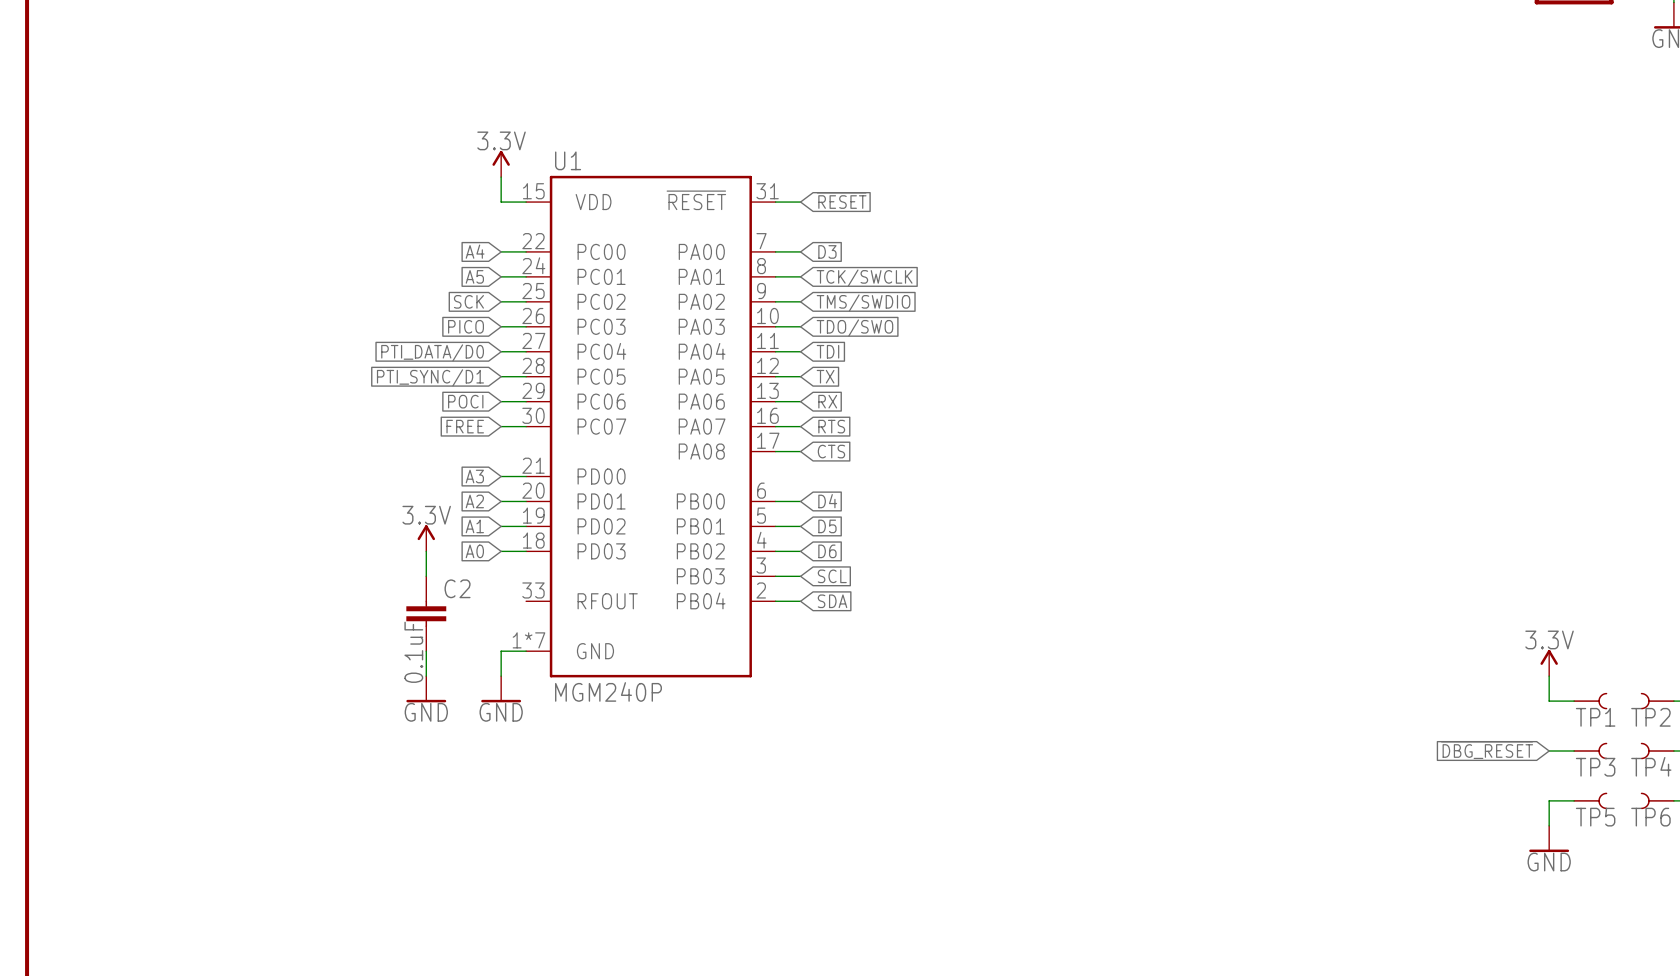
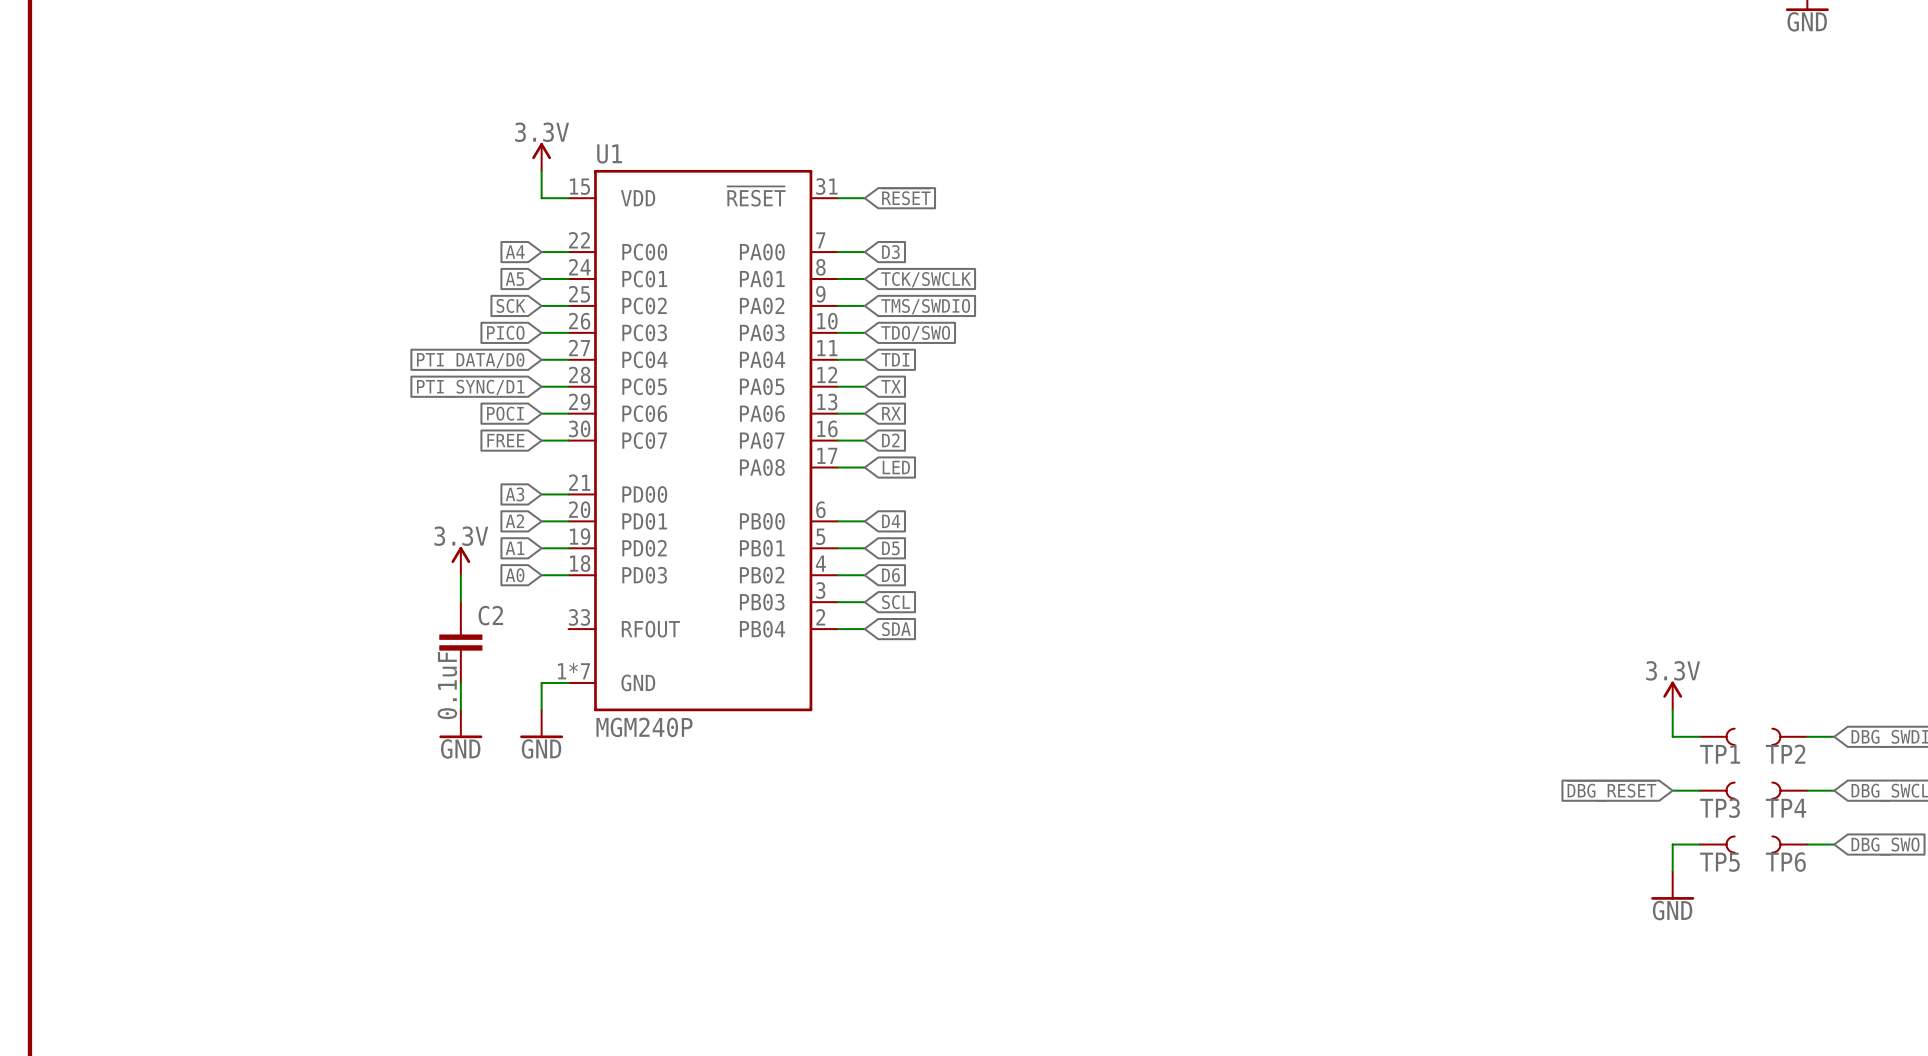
global label: RTS (831, 426) -> D2 (890, 440)
global label: CTS (831, 451) -> LED (896, 467)

